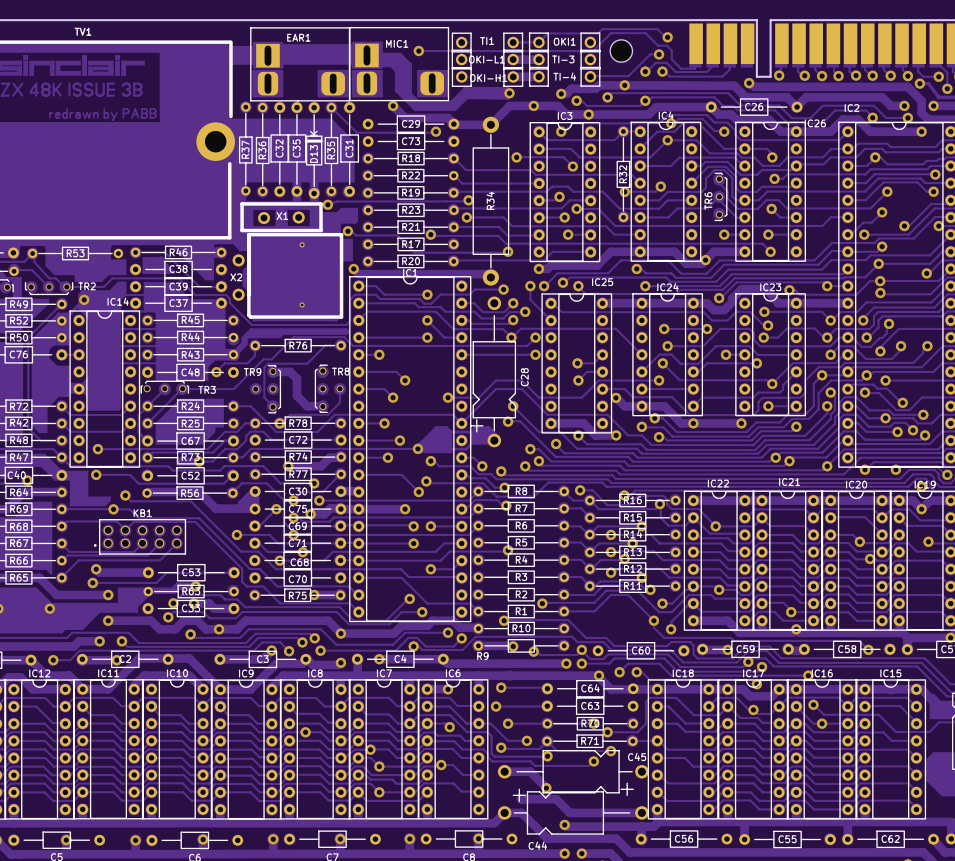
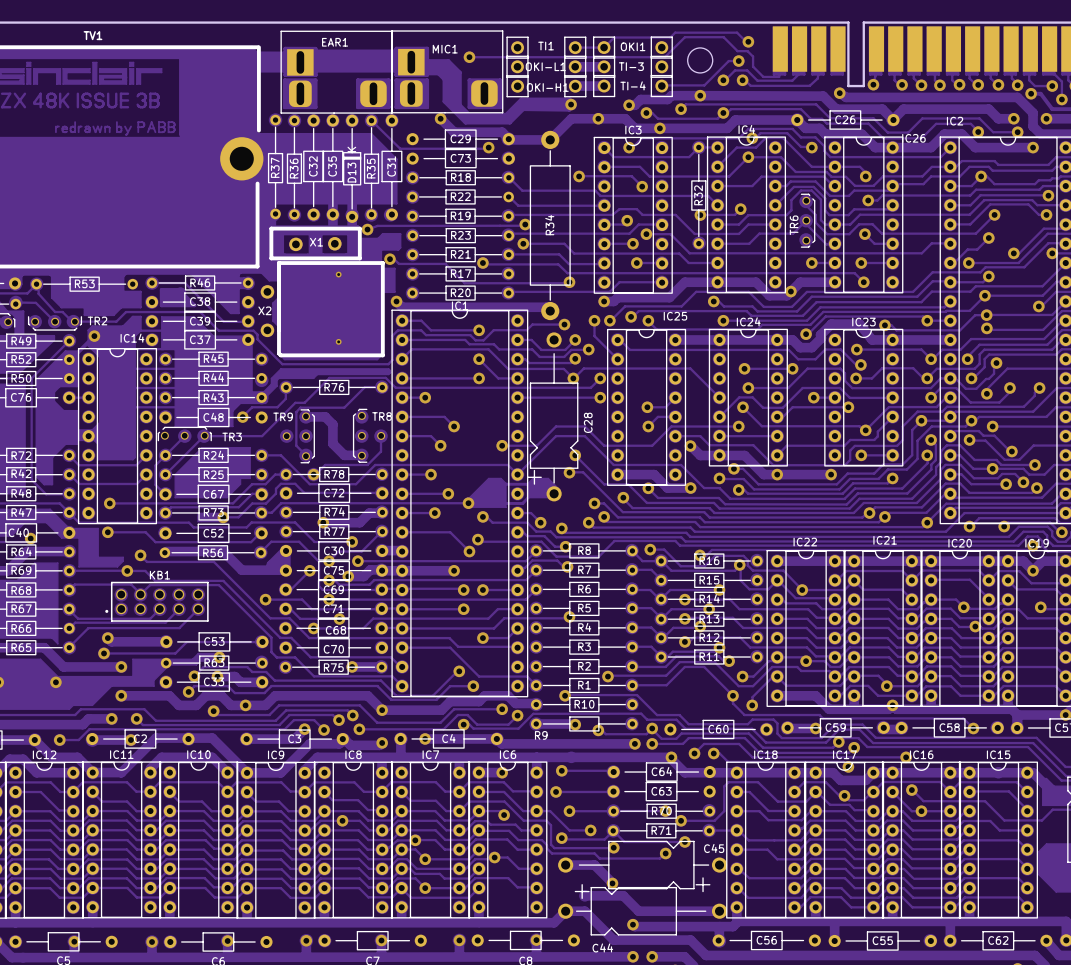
round board edge: none -> [687, 47, 713, 74]
part: (621, 51) -> none

